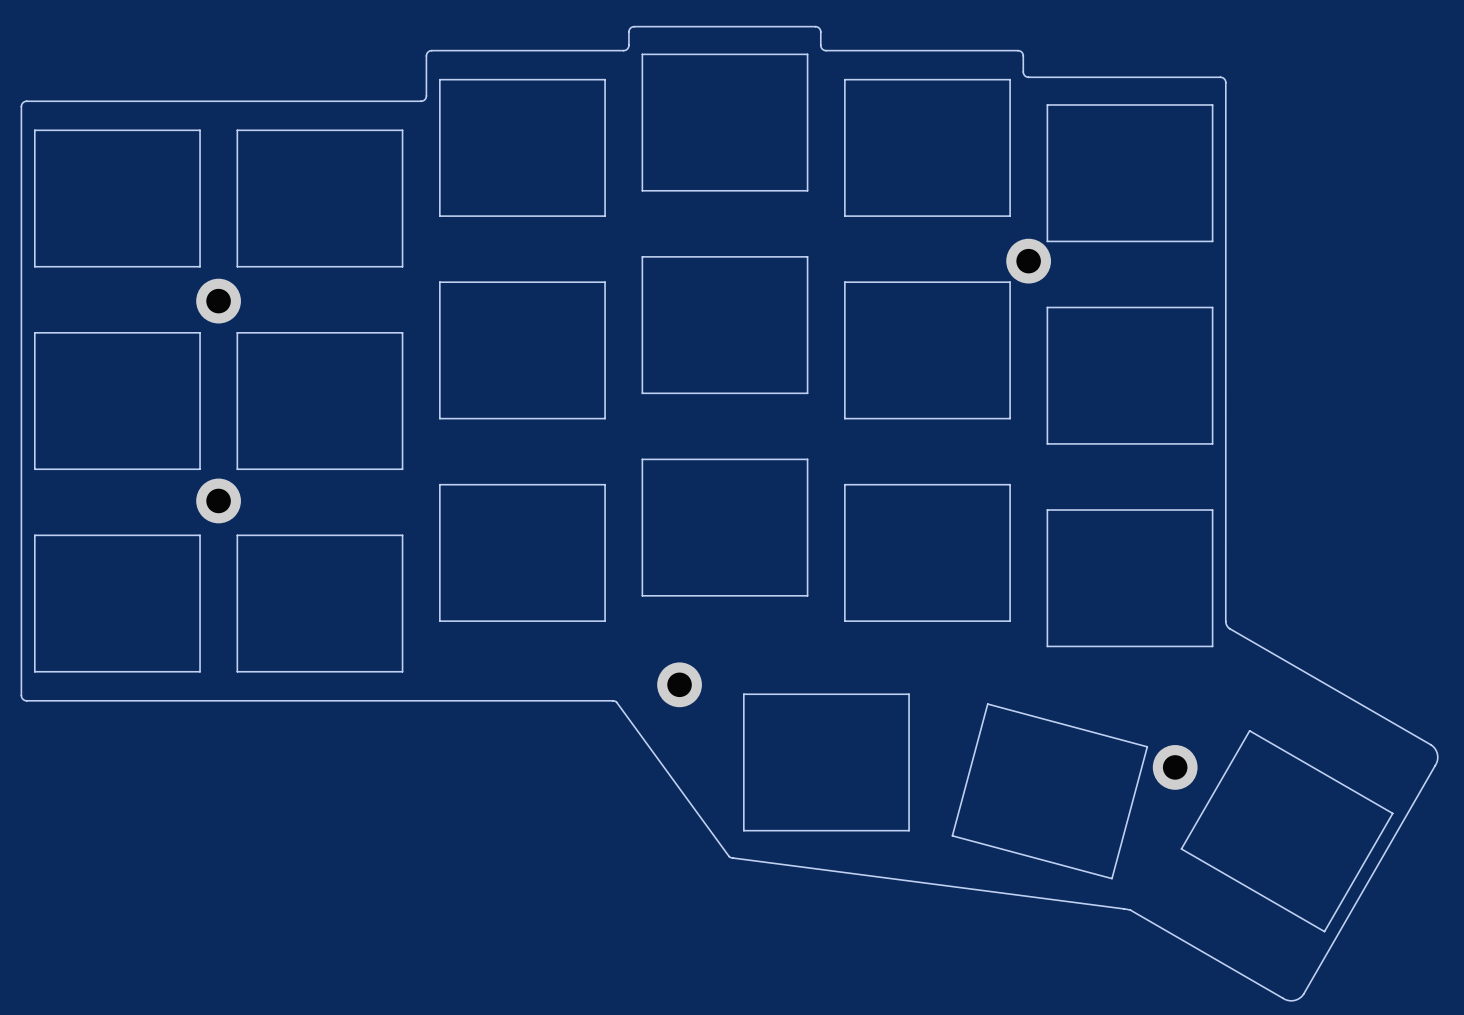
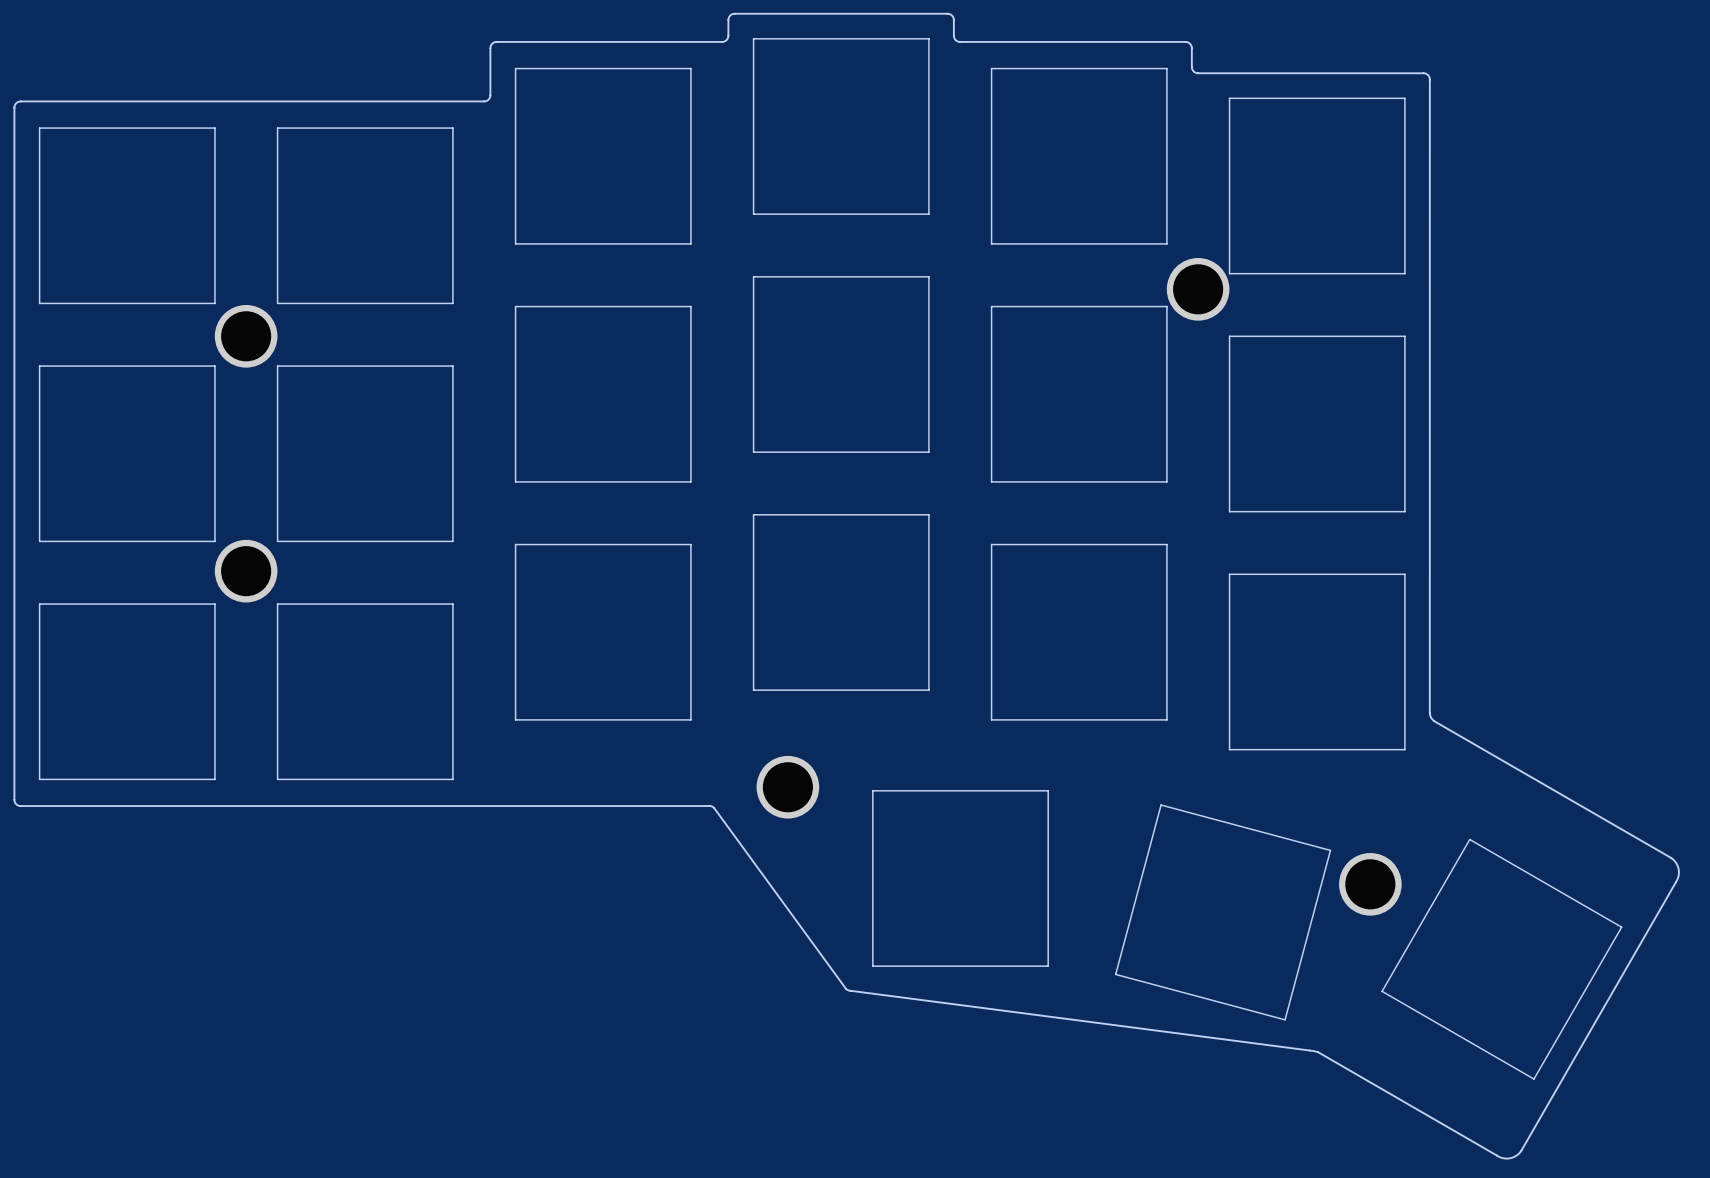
drawing shape: [641, 53, 809, 192] -> [752, 38, 930, 215]
drawing shape: [439, 79, 606, 217] -> [514, 67, 692, 245]
drawing shape: [844, 79, 1011, 217] -> [990, 67, 1168, 245]
drawing shape: [1046, 104, 1214, 243] -> [1228, 97, 1406, 275]
drawing shape: [34, 129, 201, 268] -> [38, 127, 216, 305]
drawing shape: [236, 129, 404, 268] -> [276, 127, 454, 305]
part footprint: [1006, 238, 1052, 284] -> [1166, 258, 1230, 321]
drawing shape: [641, 256, 809, 394] -> [752, 276, 930, 453]
part footprint: [196, 278, 241, 324] -> [214, 304, 278, 368]
drawing shape: [439, 281, 606, 420] -> [514, 305, 692, 483]
drawing shape: [844, 281, 1011, 420] -> [990, 305, 1168, 483]
drawing shape: [1046, 306, 1214, 445] -> [1228, 335, 1406, 513]
drawing shape: [34, 332, 201, 470] -> [38, 365, 216, 543]
drawing shape: [236, 332, 404, 470] -> [276, 365, 454, 543]
drawing shape: [641, 458, 809, 597] -> [752, 514, 930, 691]
part footprint: [196, 478, 241, 524] -> [214, 539, 278, 603]
drawing shape: [439, 484, 606, 622] -> [514, 543, 692, 721]
drawing shape: [844, 484, 1011, 622] -> [990, 543, 1168, 721]
drawing shape: [1046, 509, 1214, 648] -> [1228, 573, 1406, 751]
drawing shape: [34, 534, 201, 673] -> [38, 603, 216, 781]
drawing shape: [236, 534, 404, 673] -> [276, 603, 454, 781]
part footprint: [657, 662, 702, 708] -> [756, 755, 820, 819]
drawing shape: [743, 693, 910, 832] -> [872, 790, 1049, 967]
drawing shape: [951, 703, 1148, 880] -> [1114, 804, 1332, 1021]
drawing shape: [1180, 730, 1394, 933] -> [1381, 838, 1623, 1080]
part footprint: [1152, 745, 1198, 790] -> [1339, 853, 1402, 916]

